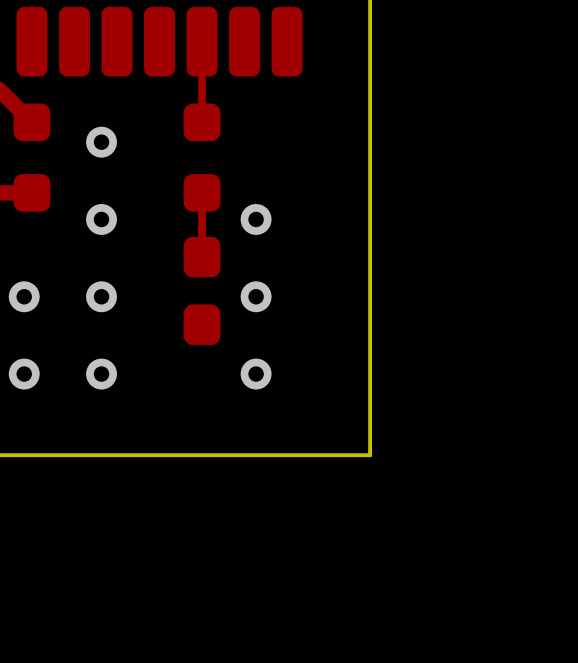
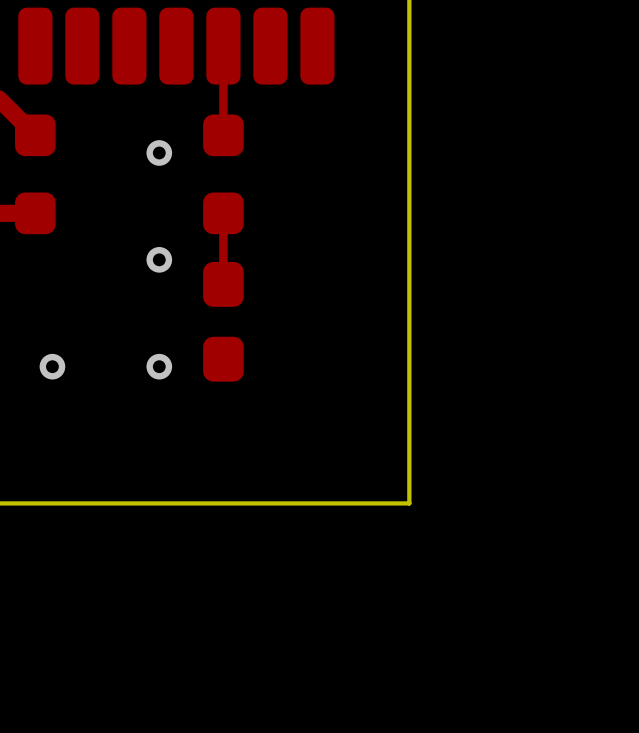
via: none -> (159, 152)
via: (101, 142) -> none
via: (101, 219) -> none
via: (256, 219) -> none
via: none -> (159, 259)
via: (24, 296) -> none
via: (101, 296) -> none
via: (256, 296) -> none
via: none -> (52, 366)
via: none -> (159, 366)
via: (24, 374) -> none
via: (101, 374) -> none
via: (256, 374) -> none

